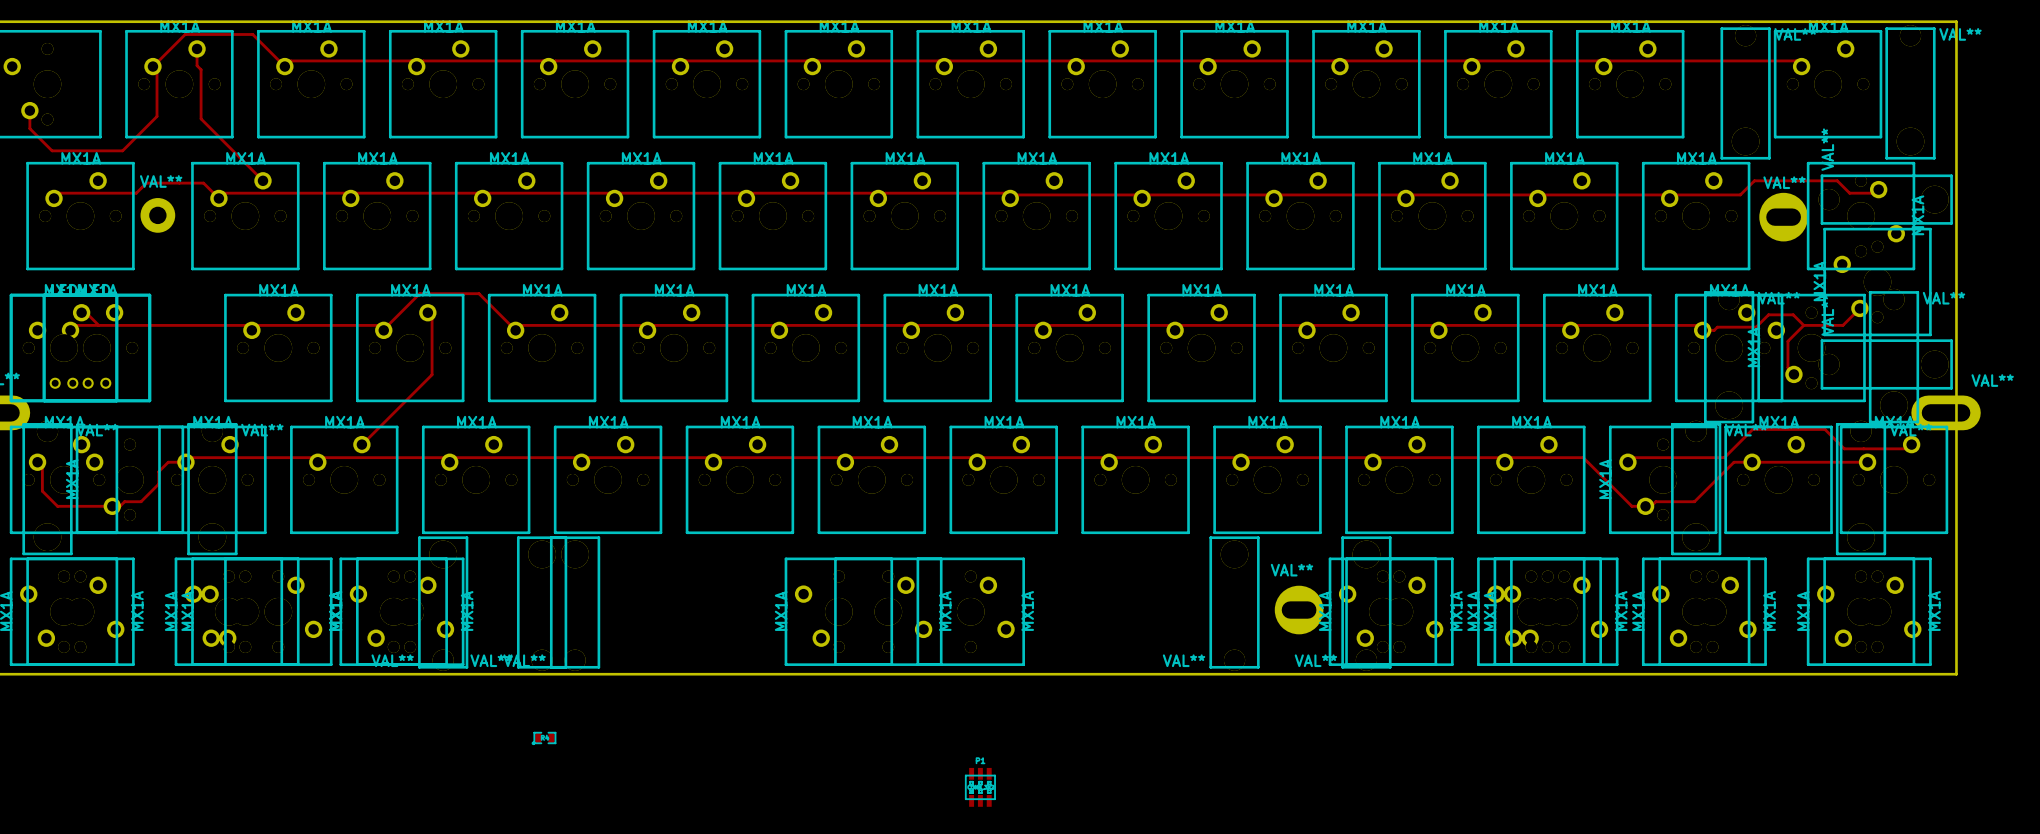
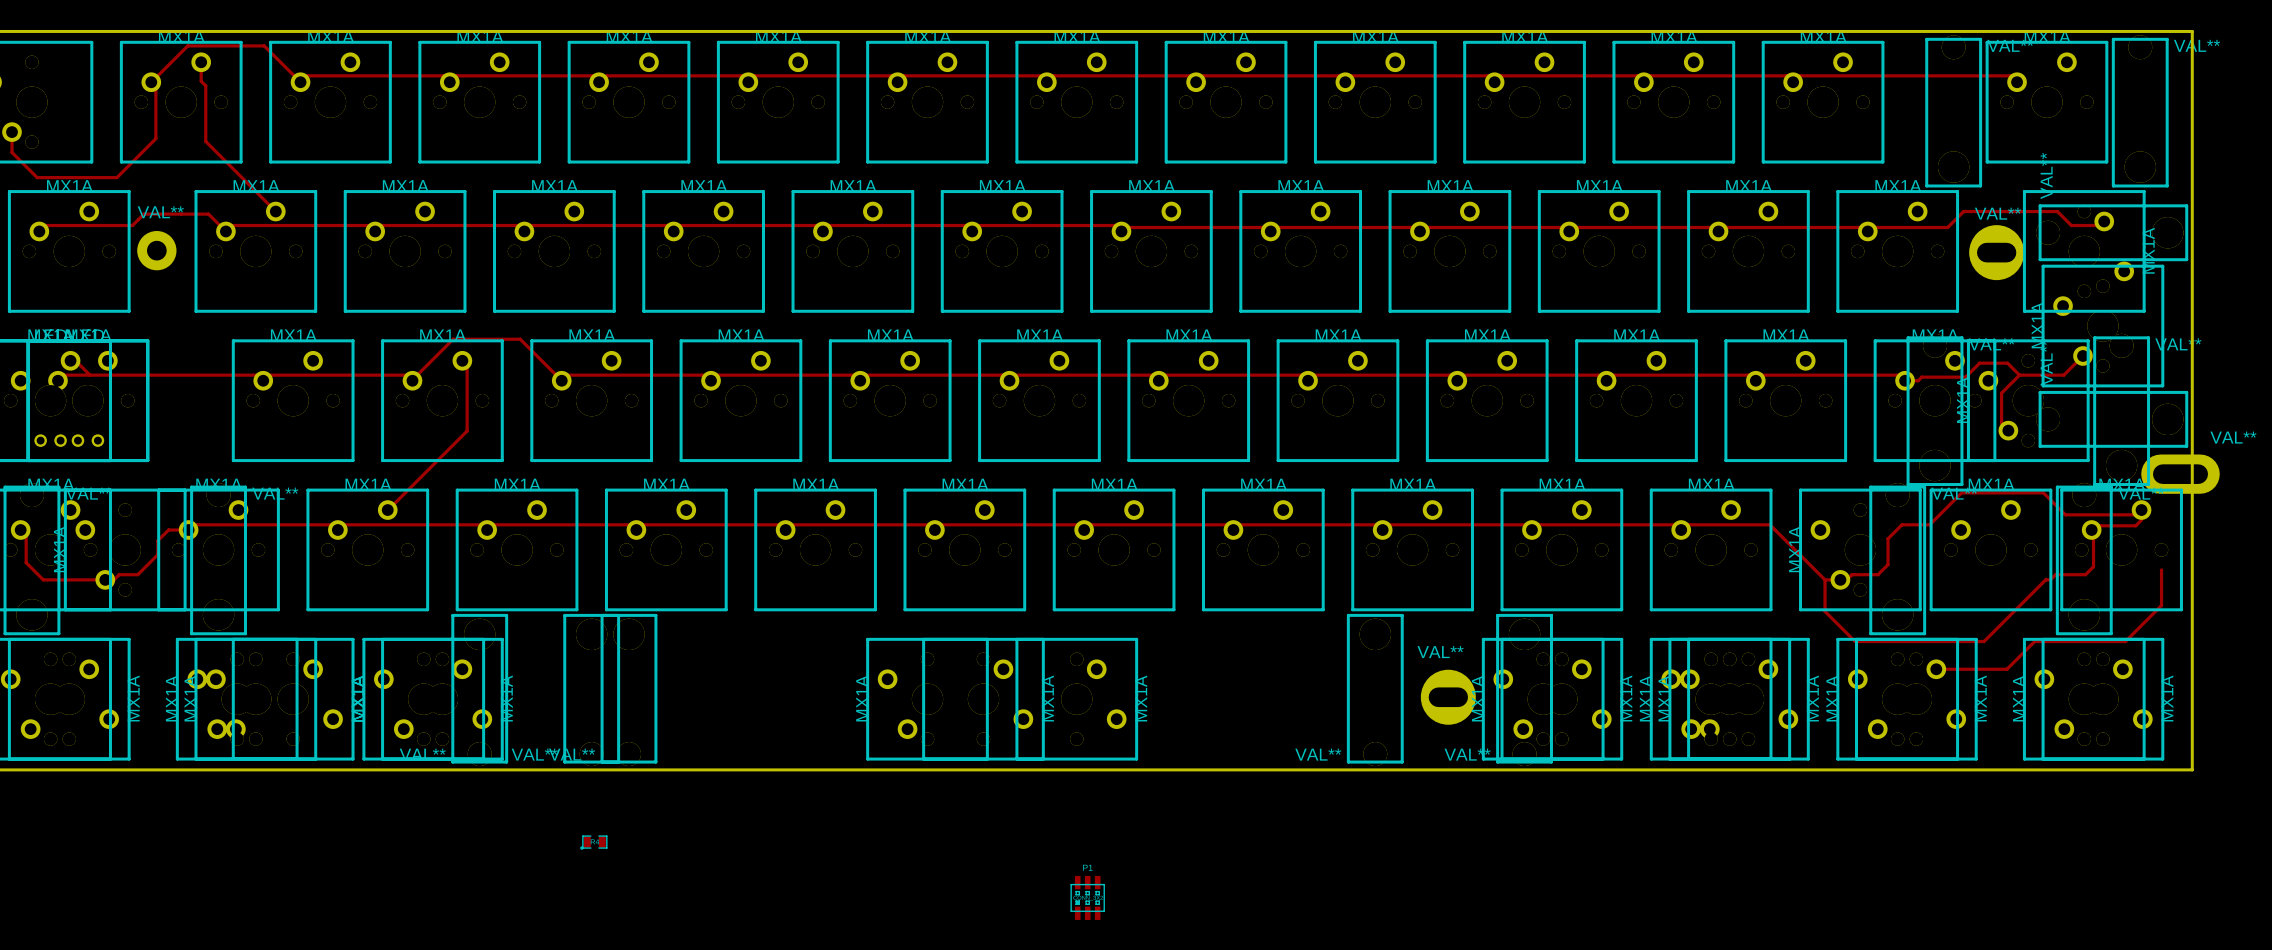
track: none -> (2141, 520) (2135, 525) (2100, 525) (2093, 532) (2093, 566) (2085, 574) (2055, 574) (2050, 579) (2045, 579) (1984, 641) (1855, 641) (1825, 611) (1825, 579)
track: (1632, 457) (1699, 457) -> (1878, 574) (1888, 564) (1888, 538) (1901, 524)
track: (1867, 462) (1733, 462) (1694, 501) (1678, 501) -> none
track: none -> (2161, 569) (2161, 605) (2125, 641) (2034, 641) (2006, 669) (1936, 669)

